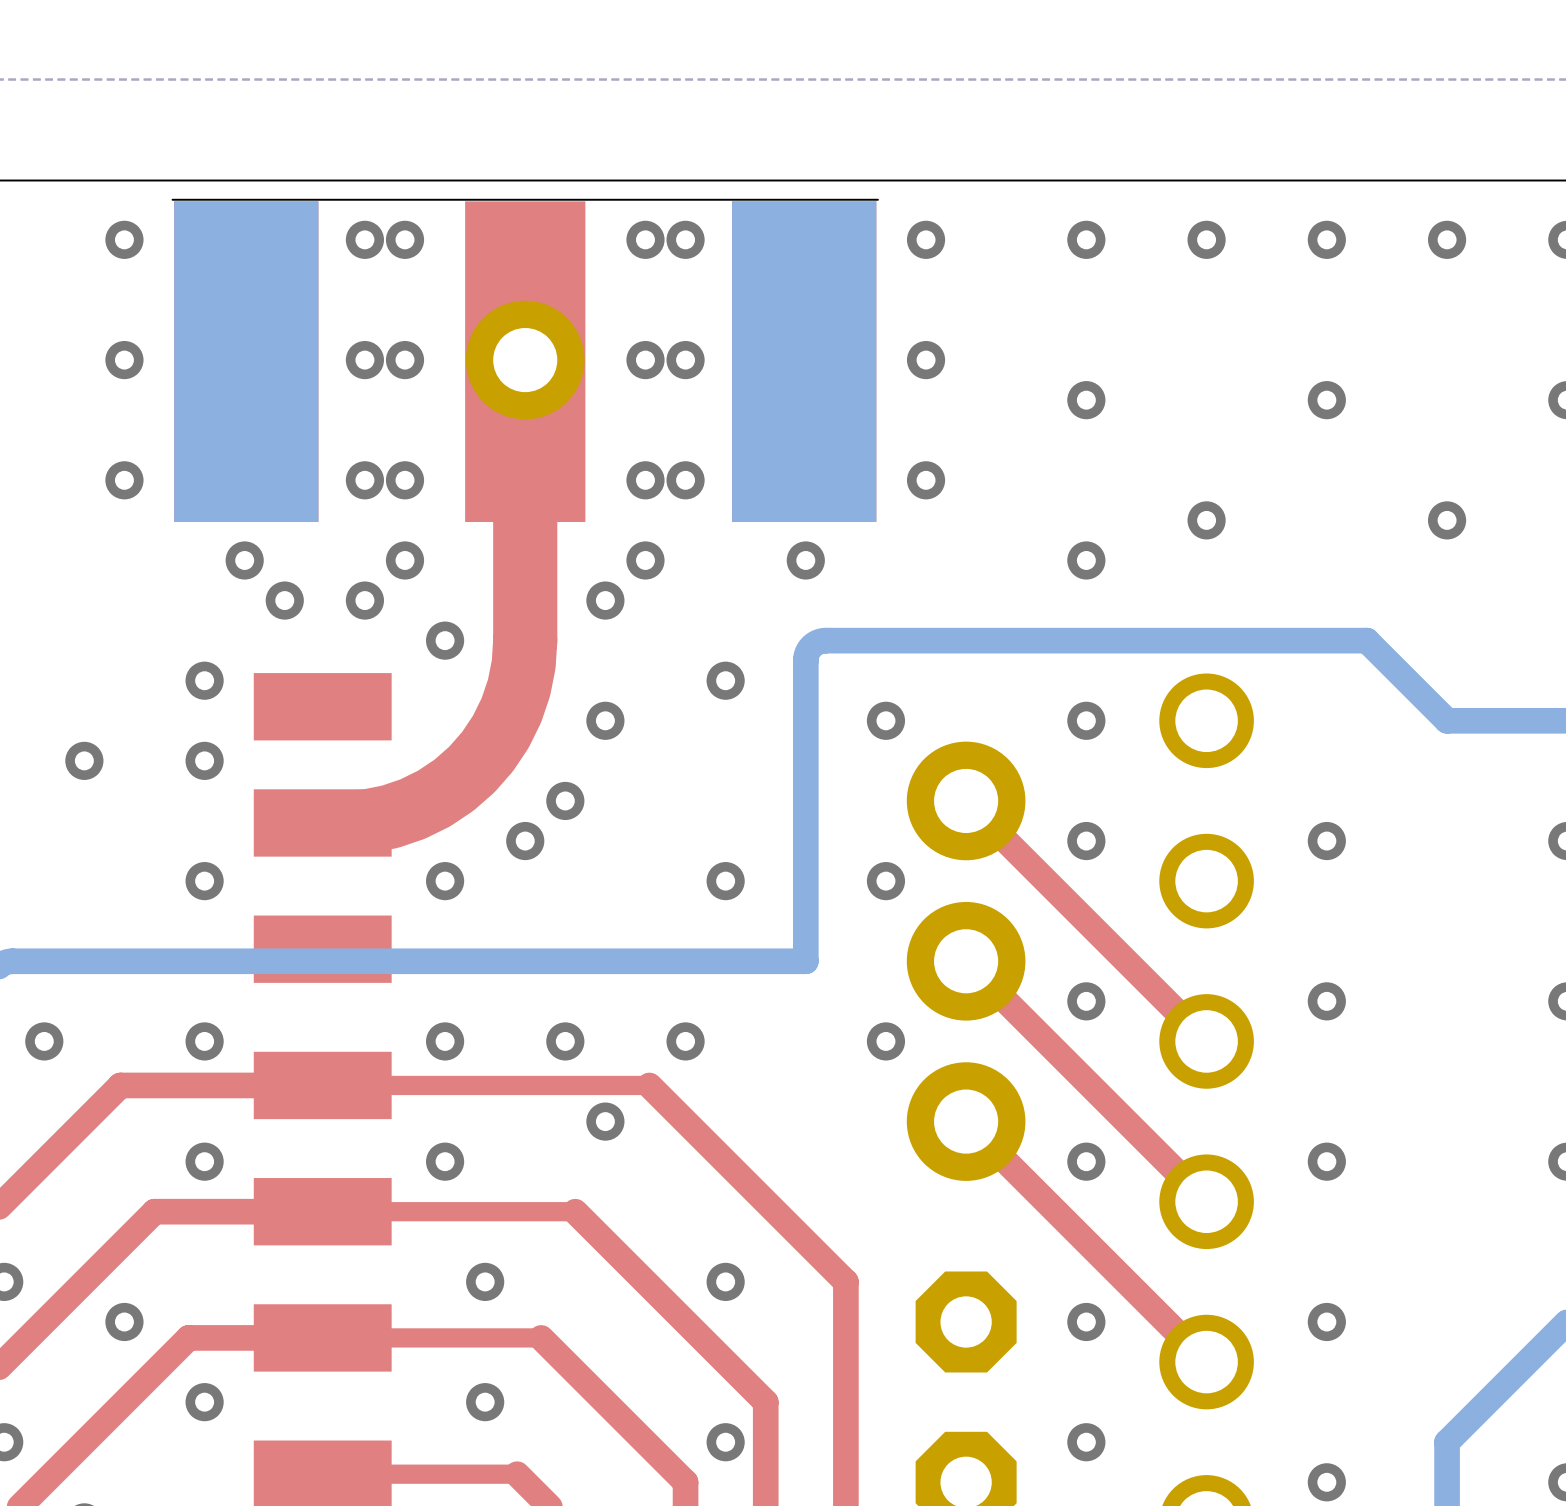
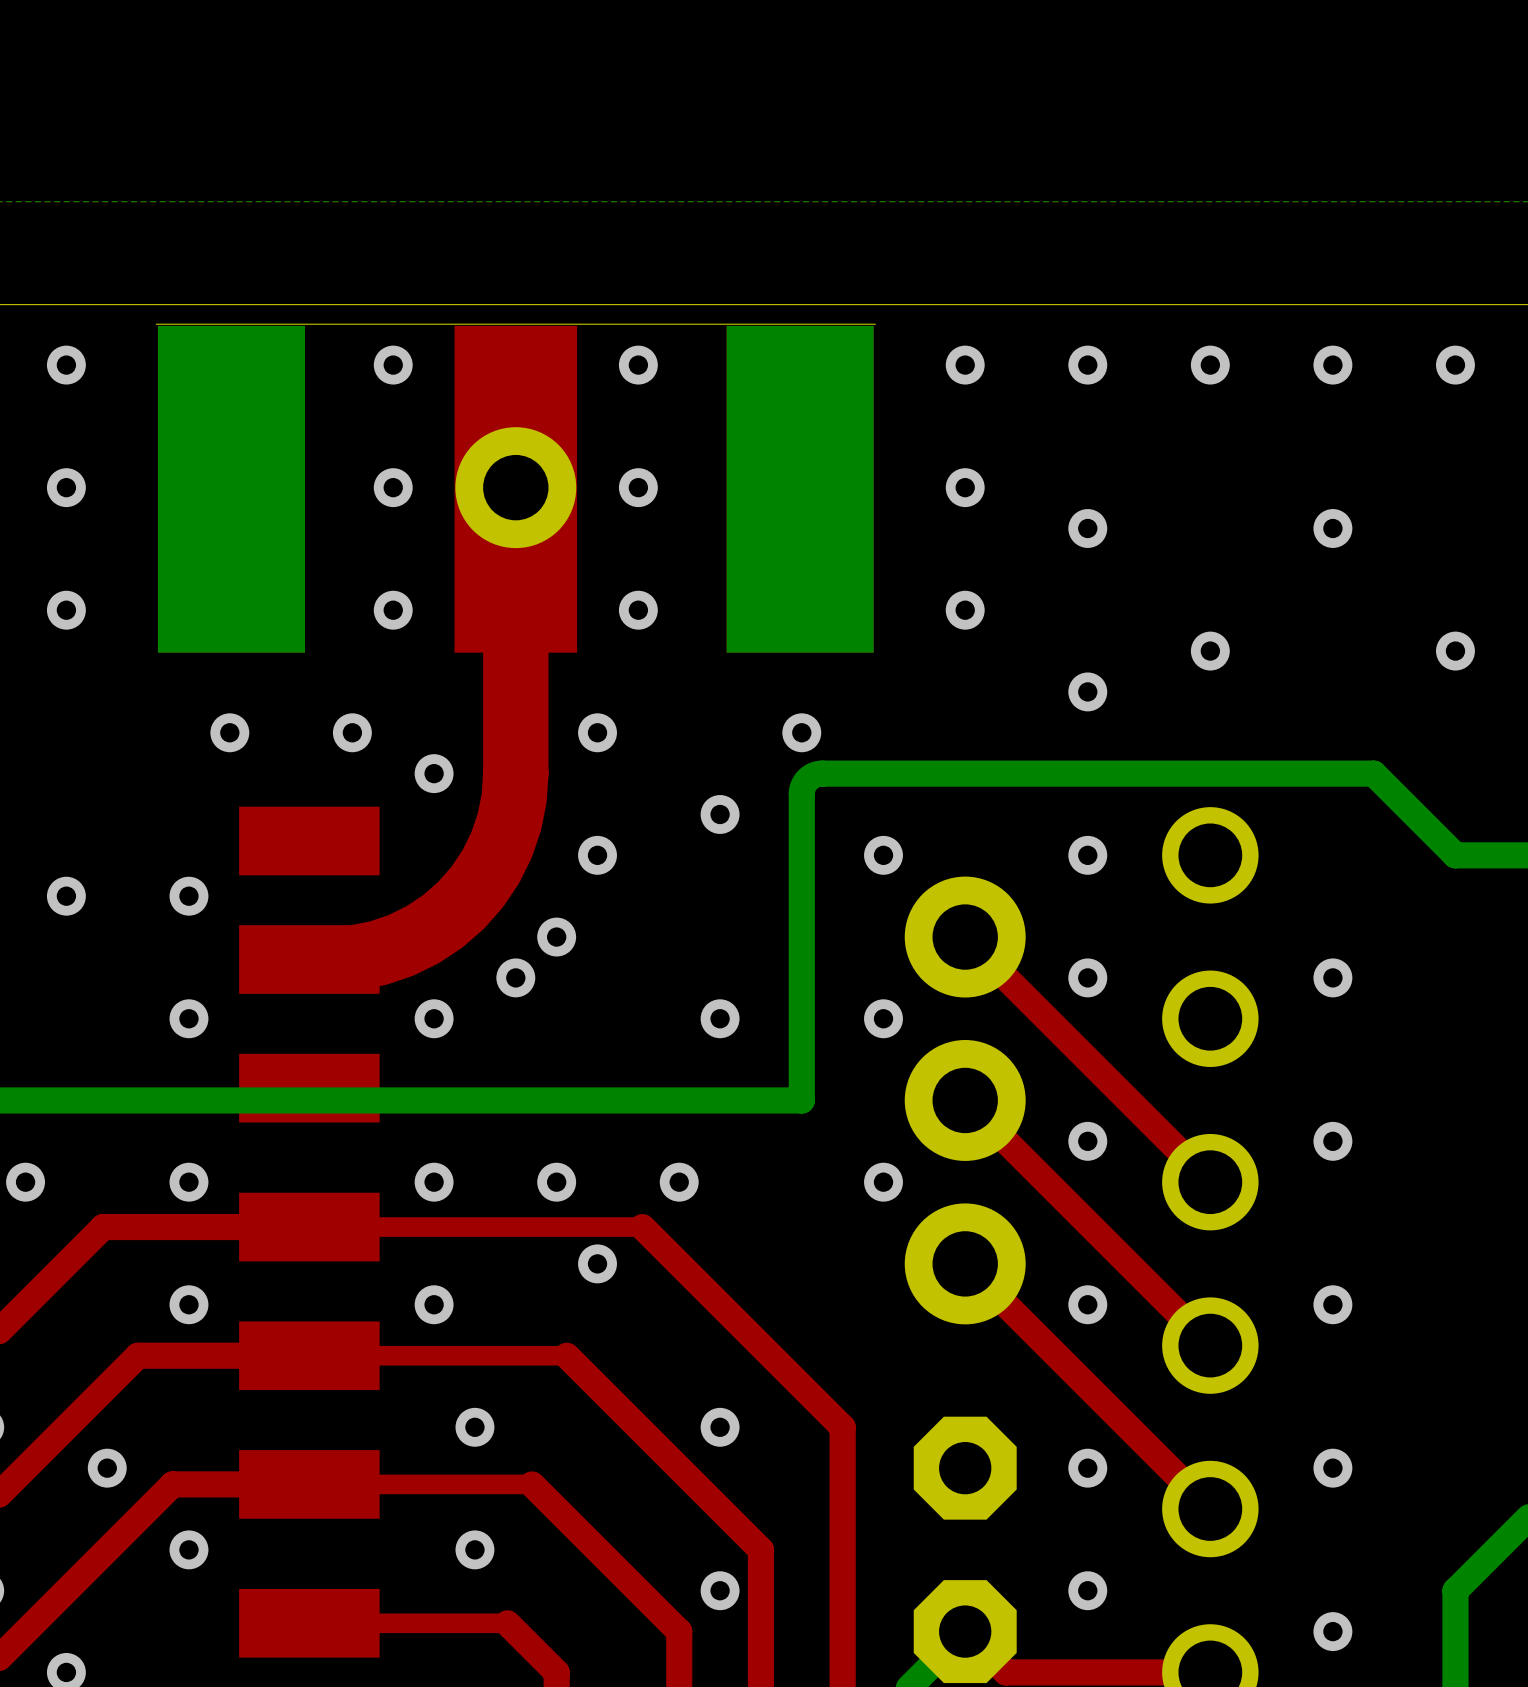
via position: (124, 239) -> (66, 365)
via: (364, 239) -> none
via: (685, 239) -> none
via position: (926, 239) -> (965, 365)
via position: (124, 360) -> (66, 487)
via: (364, 360) -> none
via: (685, 360) -> none
via position: (926, 360) -> (965, 487)
via position: (124, 480) -> (66, 610)
via: (364, 480) -> none
via: (685, 480) -> none
via position: (926, 480) -> (965, 610)
via: (244, 560) -> none
via: (405, 560) -> none
via: (645, 560) -> none
via position: (805, 560) -> (801, 732)
via: none -> (229, 732)
via: (284, 600) -> none
via: (204, 680) -> none

